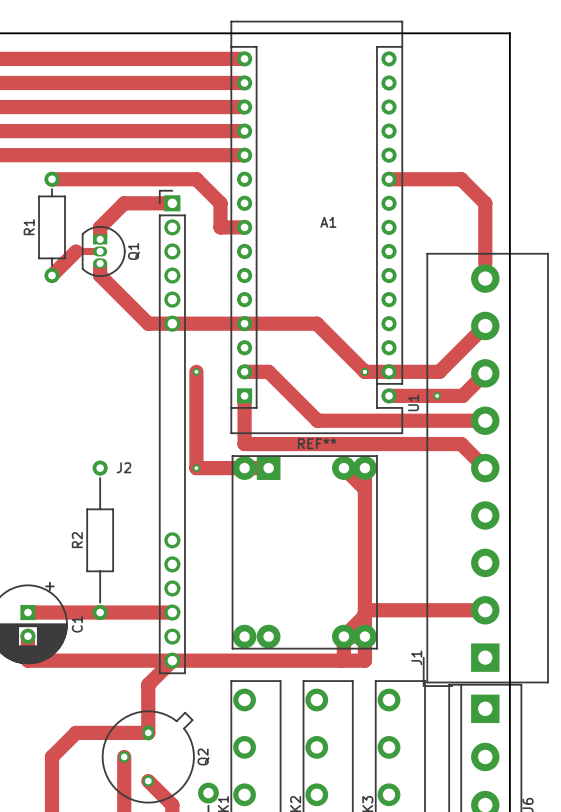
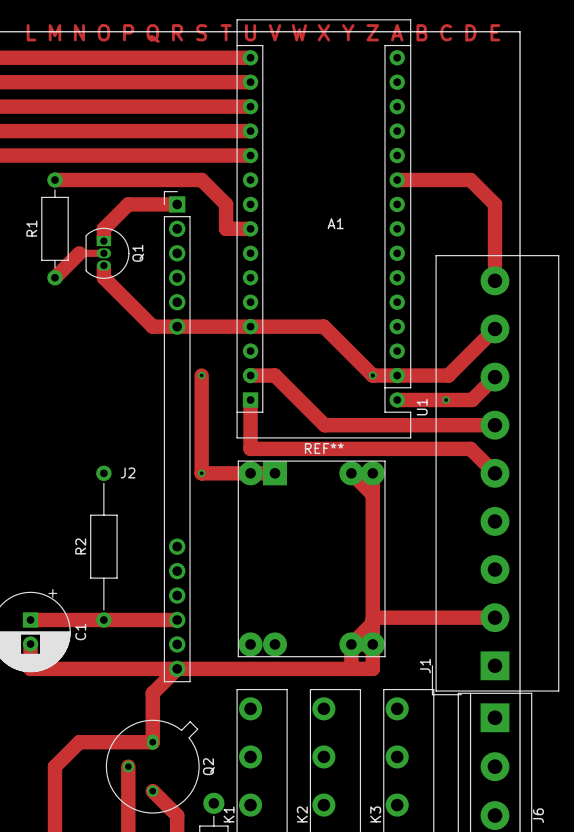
text: none -> L (31, 32)
text: none -> M (54, 32)
text: none -> N (79, 32)
text: none -> O (103, 32)
text: none -> P (128, 32)
text: none -> Q (153, 33)
text: none -> R (177, 32)
text: none -> S (201, 32)
text: none -> T (226, 32)
text: none -> U (250, 32)
text: none -> V (274, 32)
text: none -> W (299, 32)
text: none -> X (323, 32)
text: none -> Y (348, 32)
text: none -> Z (372, 32)
text: none -> A (397, 32)
text: none -> B (422, 32)
text: none -> C (446, 32)
text: none -> D (470, 32)
text: none -> E (495, 32)

